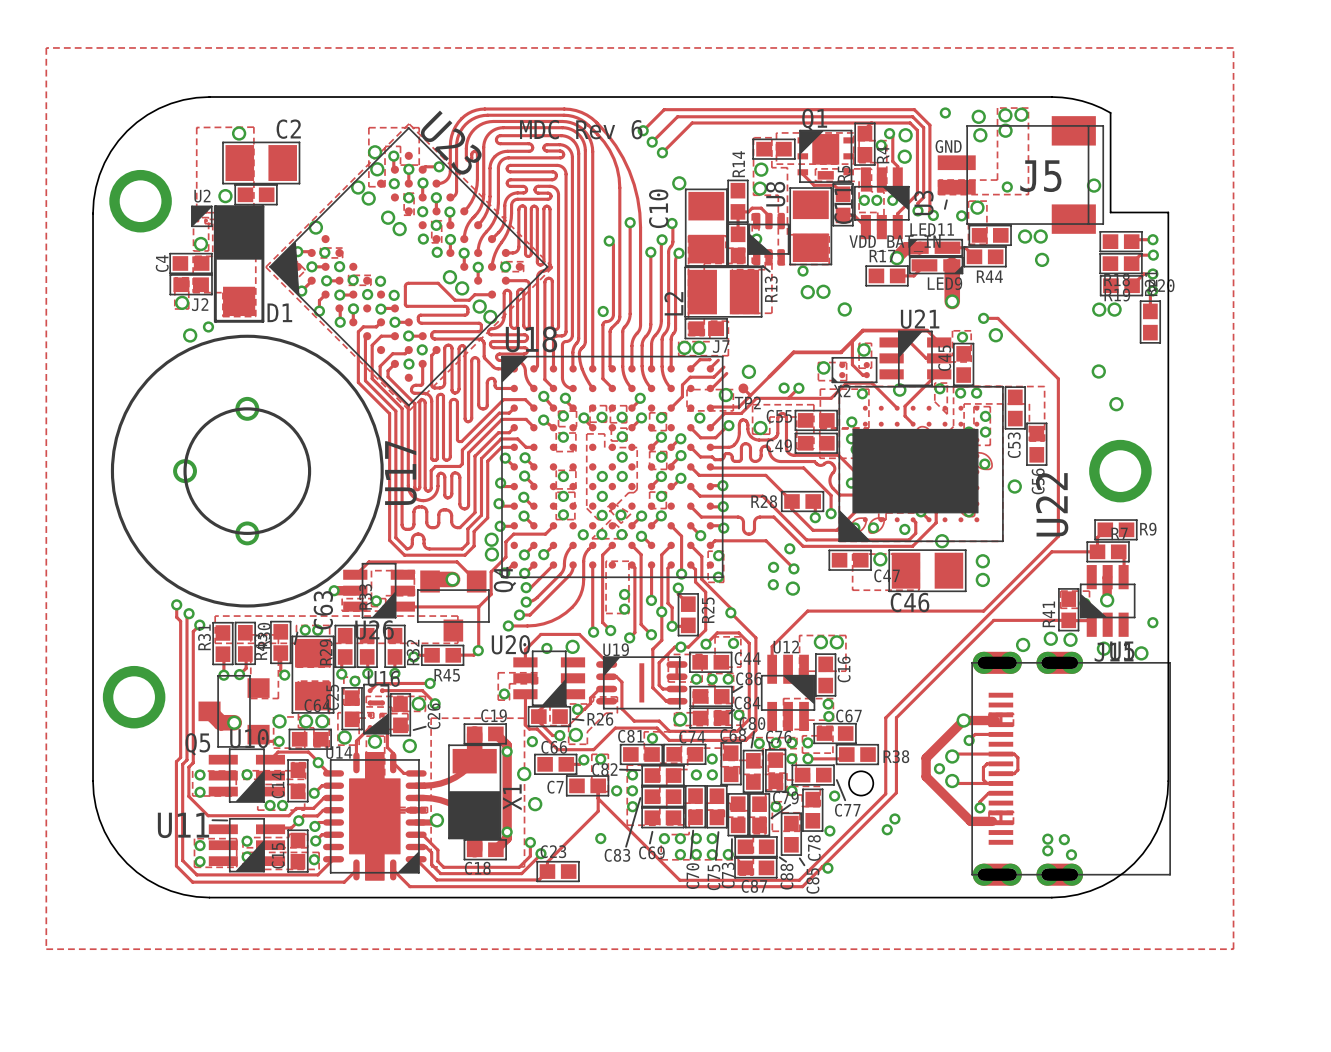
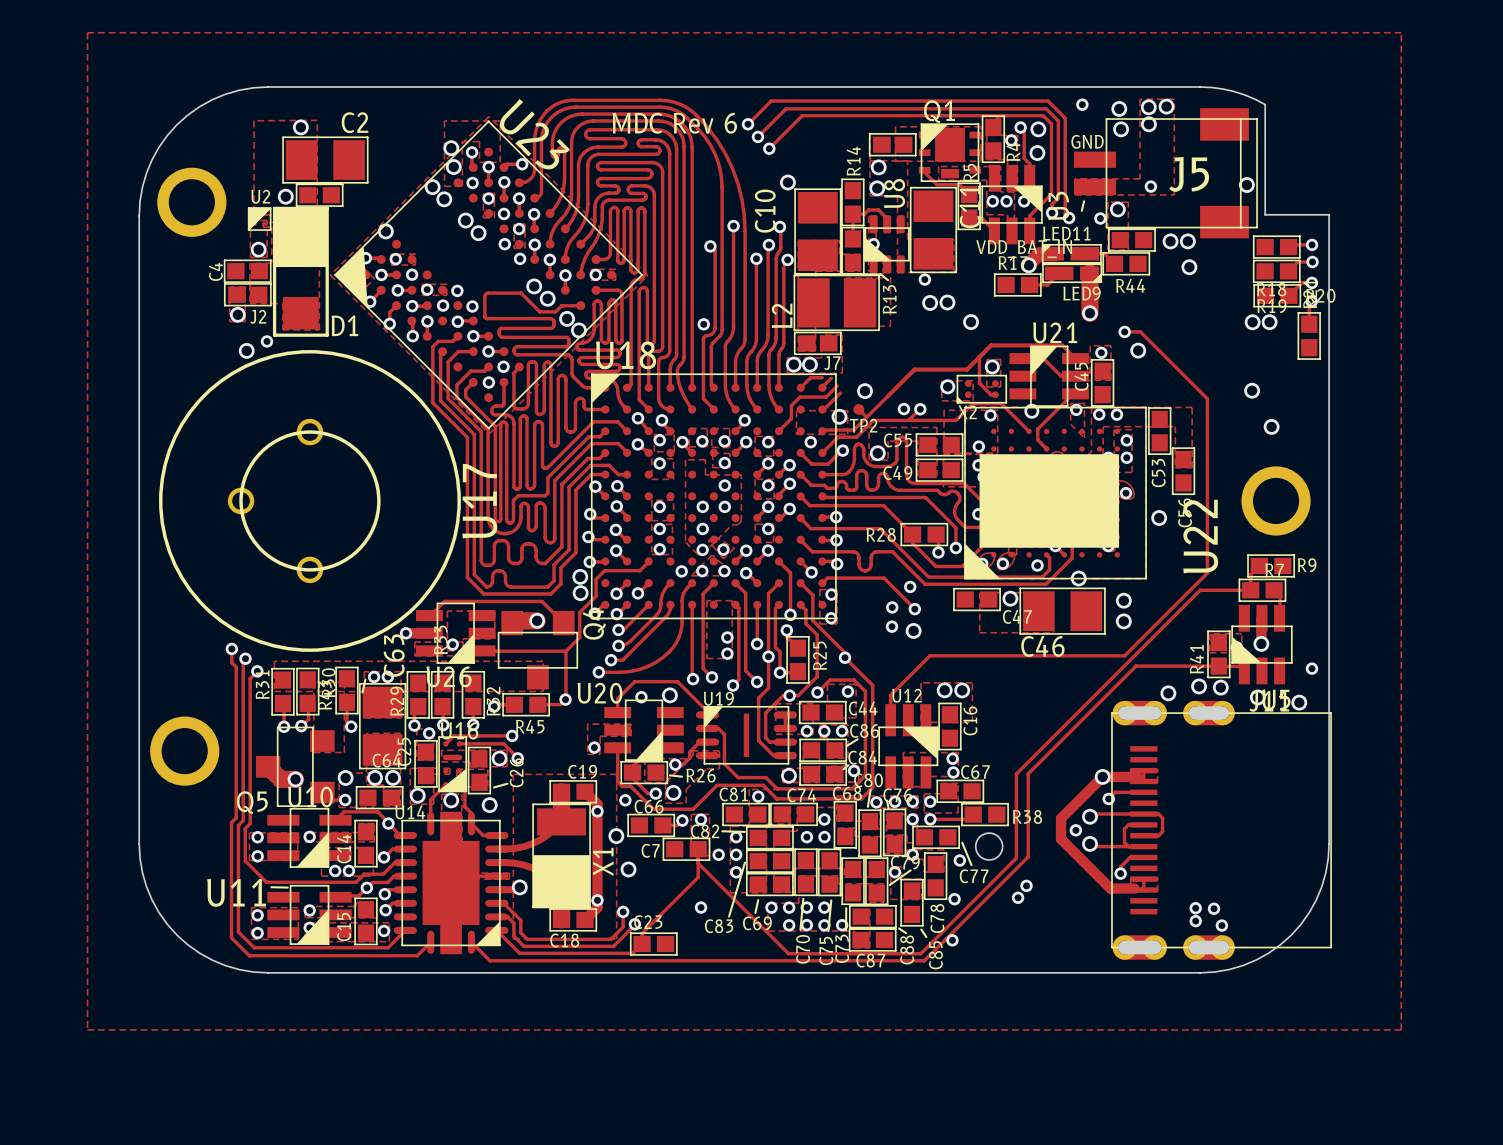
zone outline: (753, 137) (771, 137) (771, 167) (787, 167) -> (870, 160) (907, 160) (907, 165)

